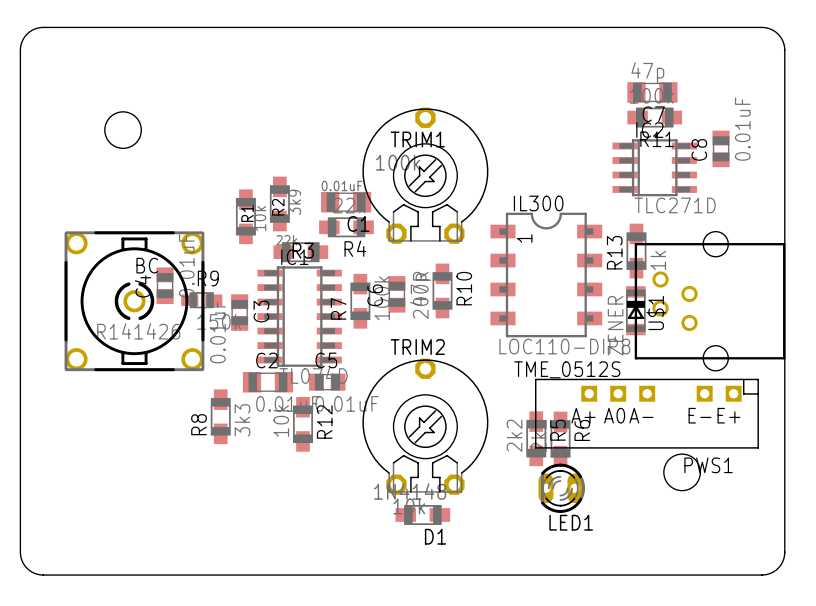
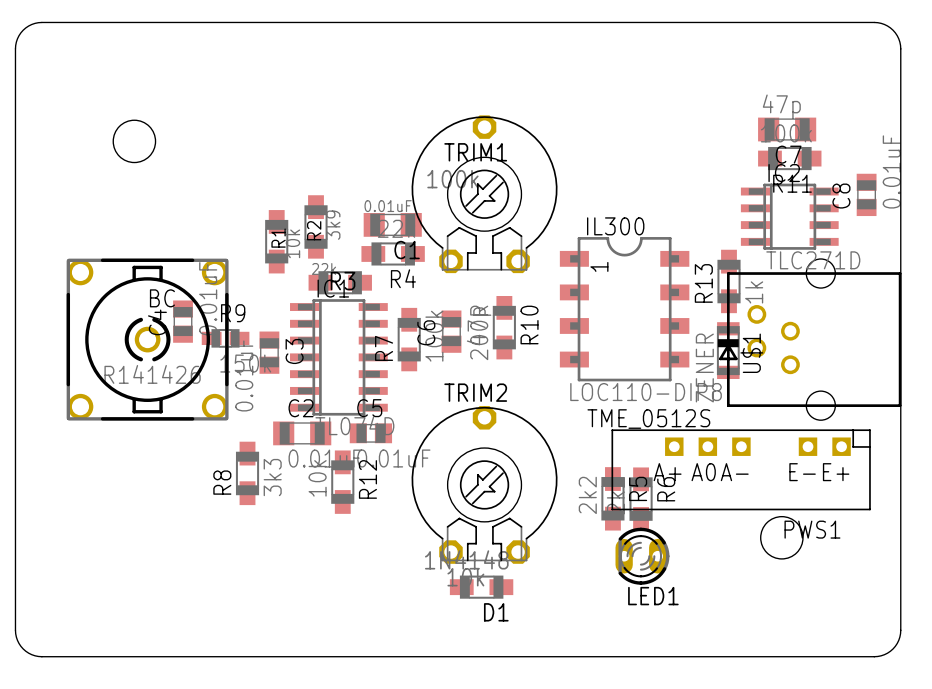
C7 position: (652, 92) -> (787, 129)
R11 position: (654, 117) -> (789, 158)
C8 position: (721, 148) -> (866, 194)
IC2 position: (654, 167) -> (789, 216)

